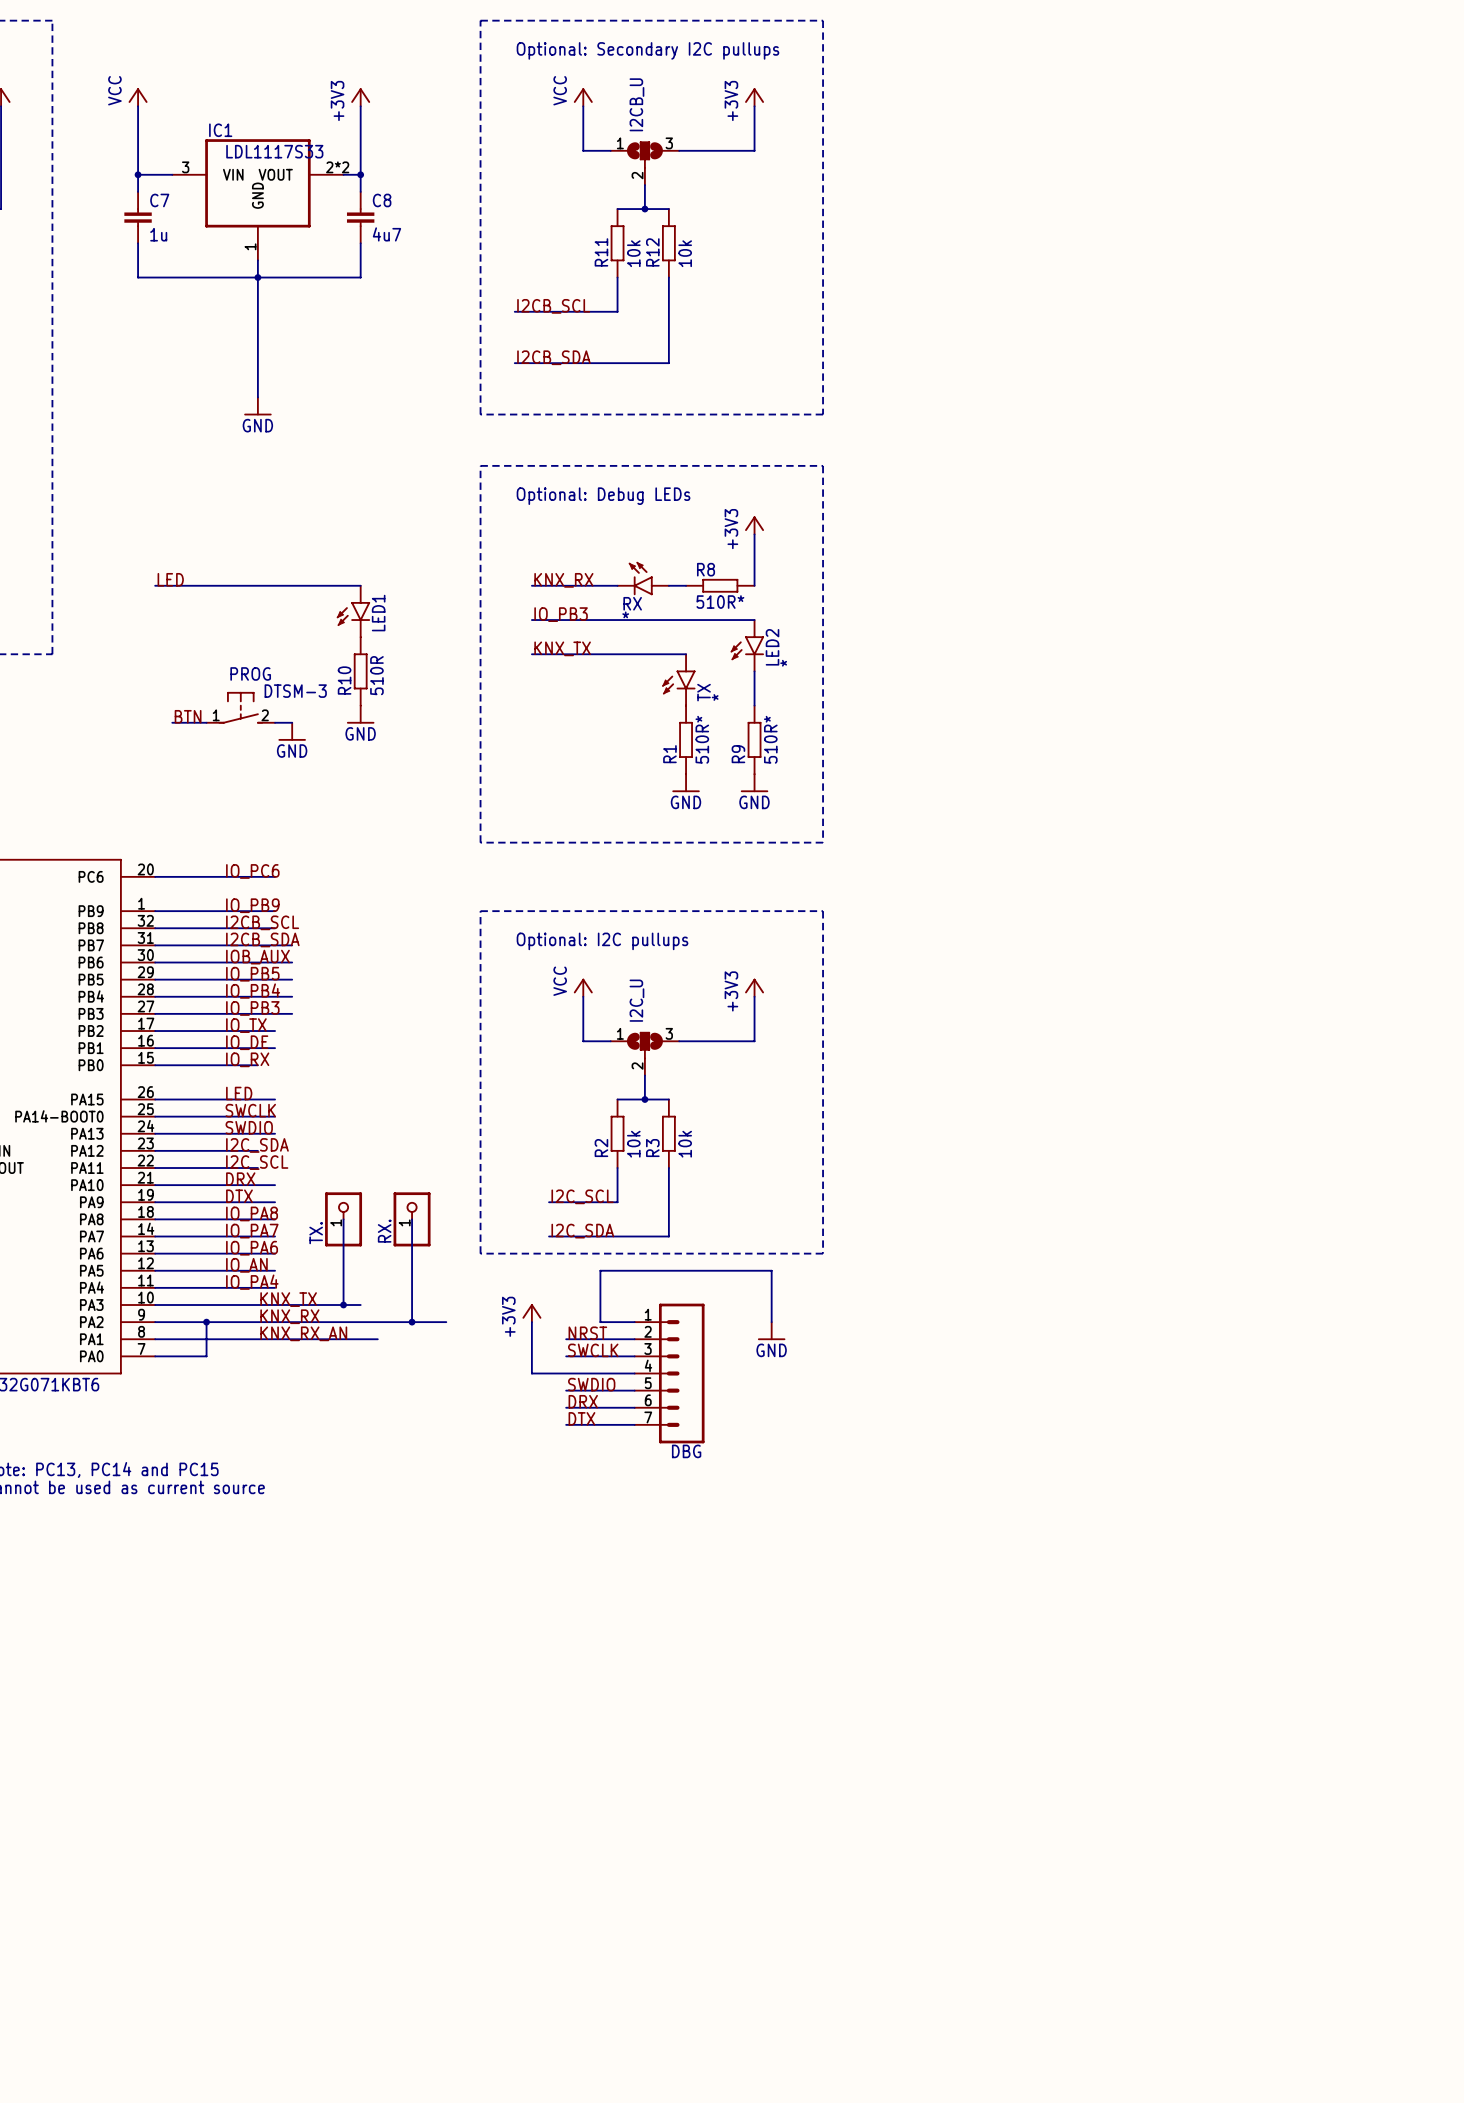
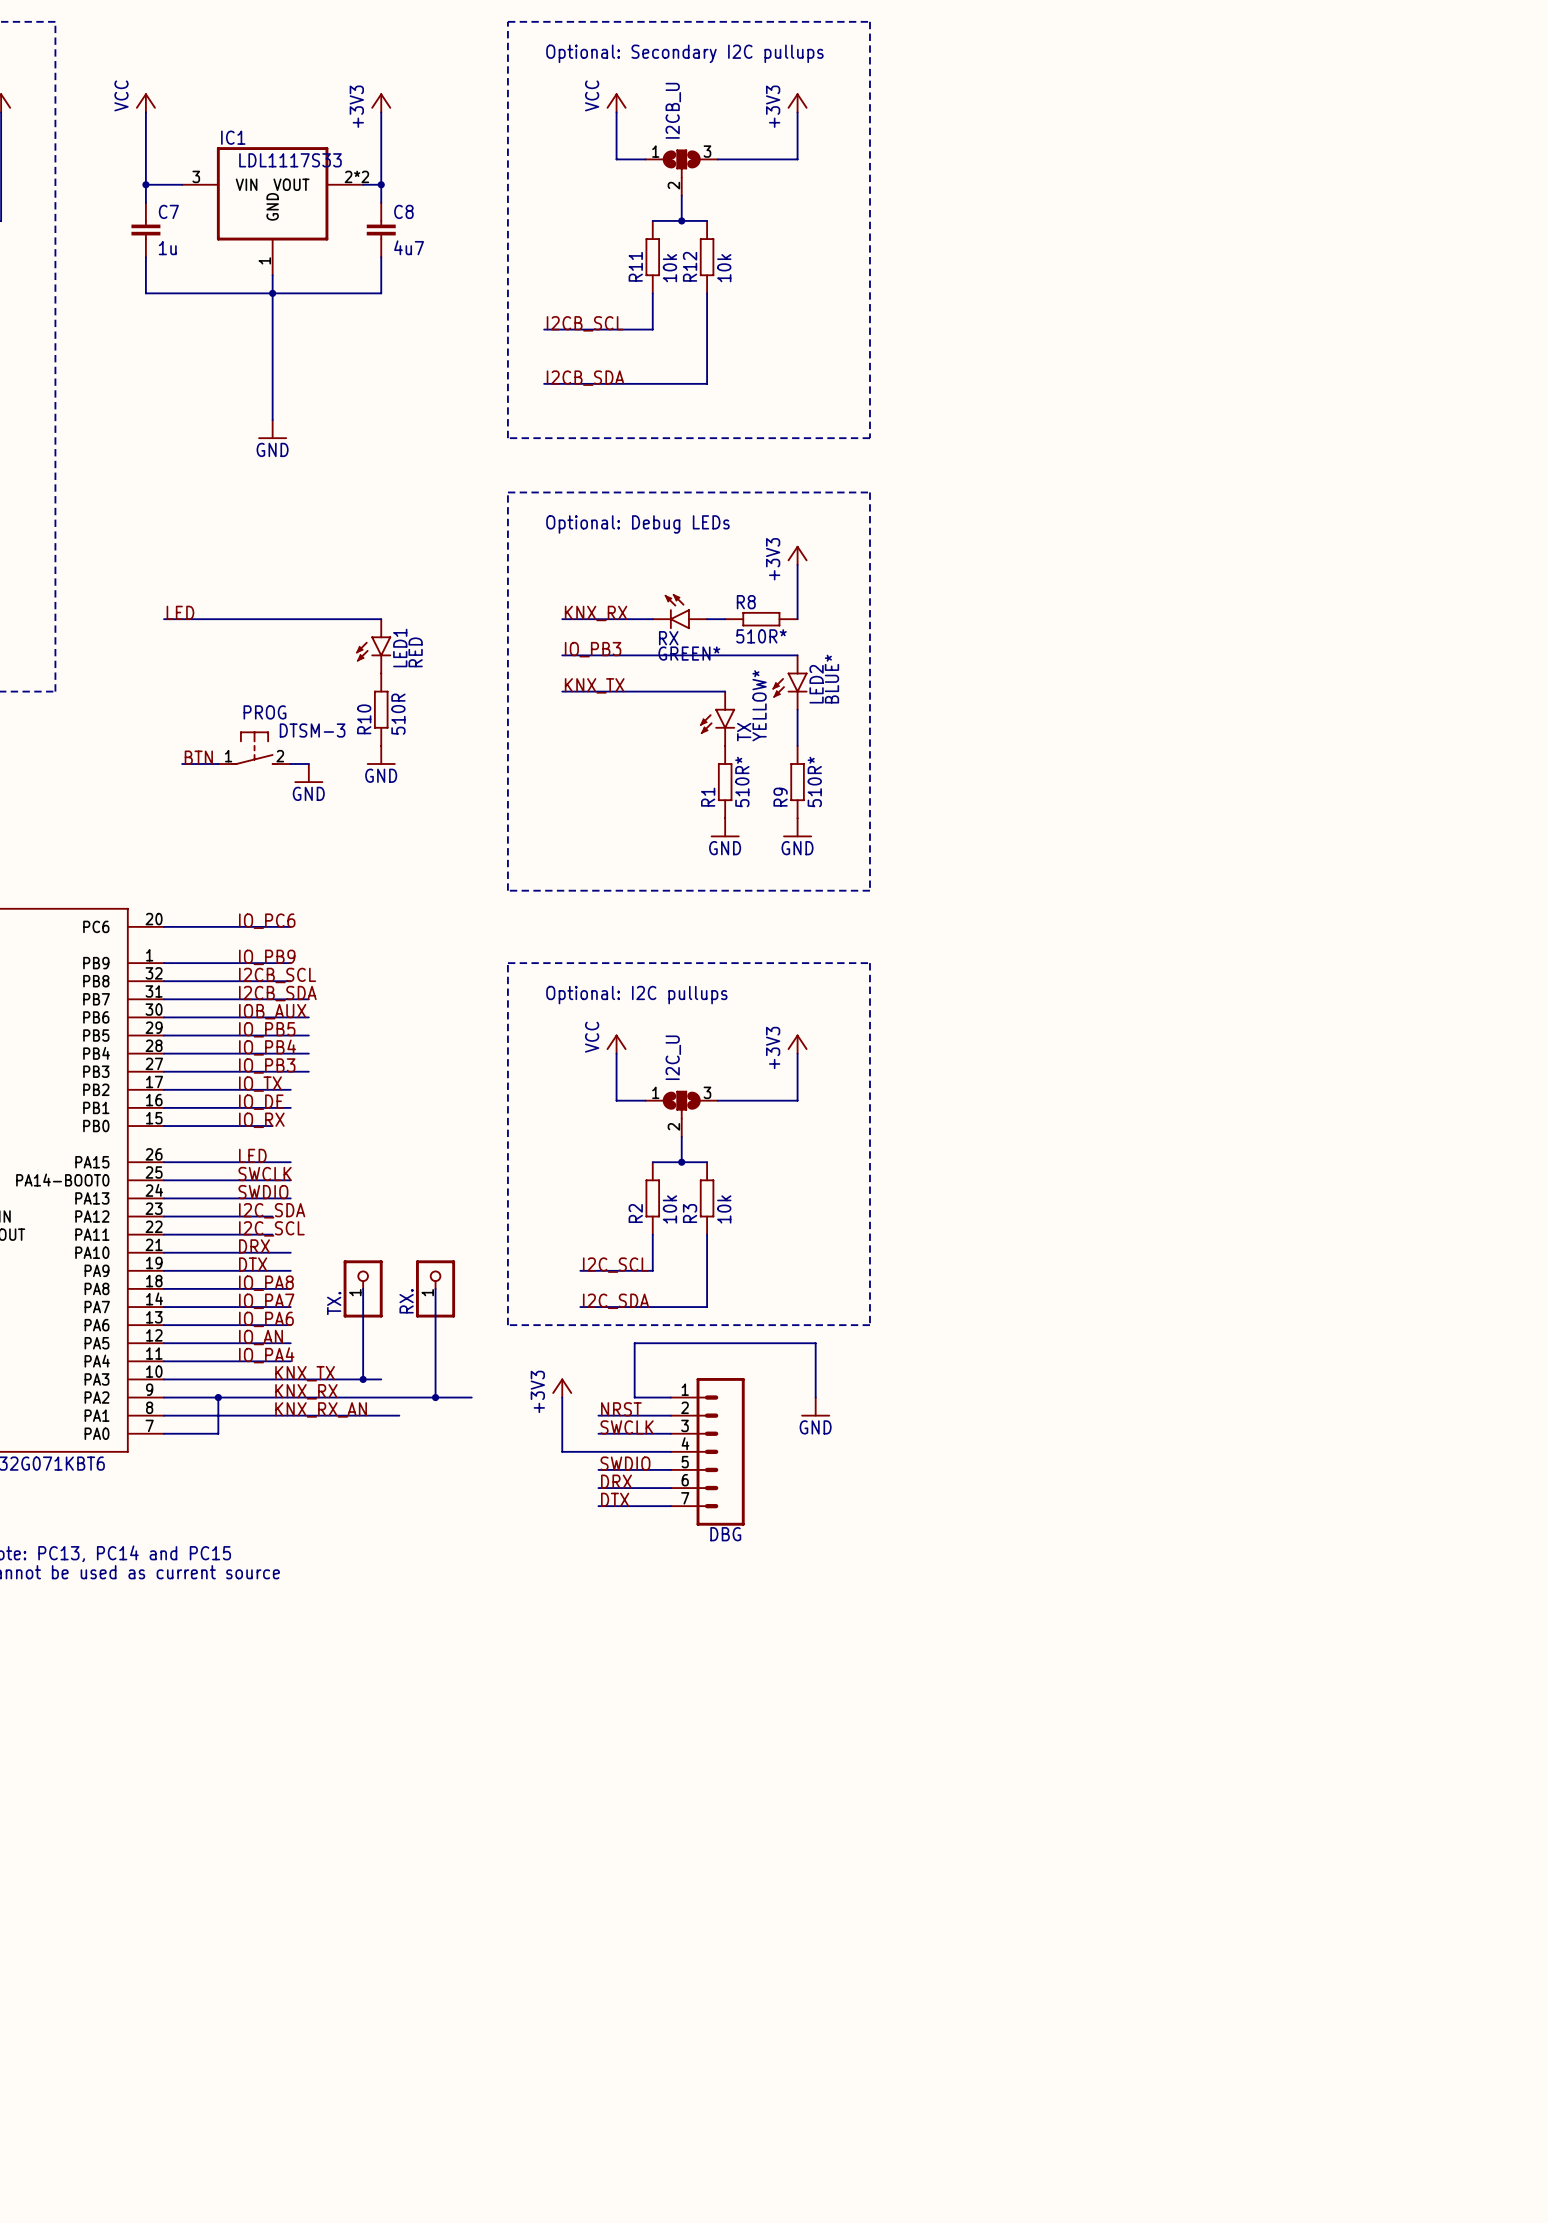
RX value: * (625, 614) -> GREEN* (689, 653)
LED1 value: none -> RED (415, 652)
LED2 value: * (783, 663) -> BLUE* (831, 679)
TX value: * (715, 697) -> YELLOW* (759, 705)

